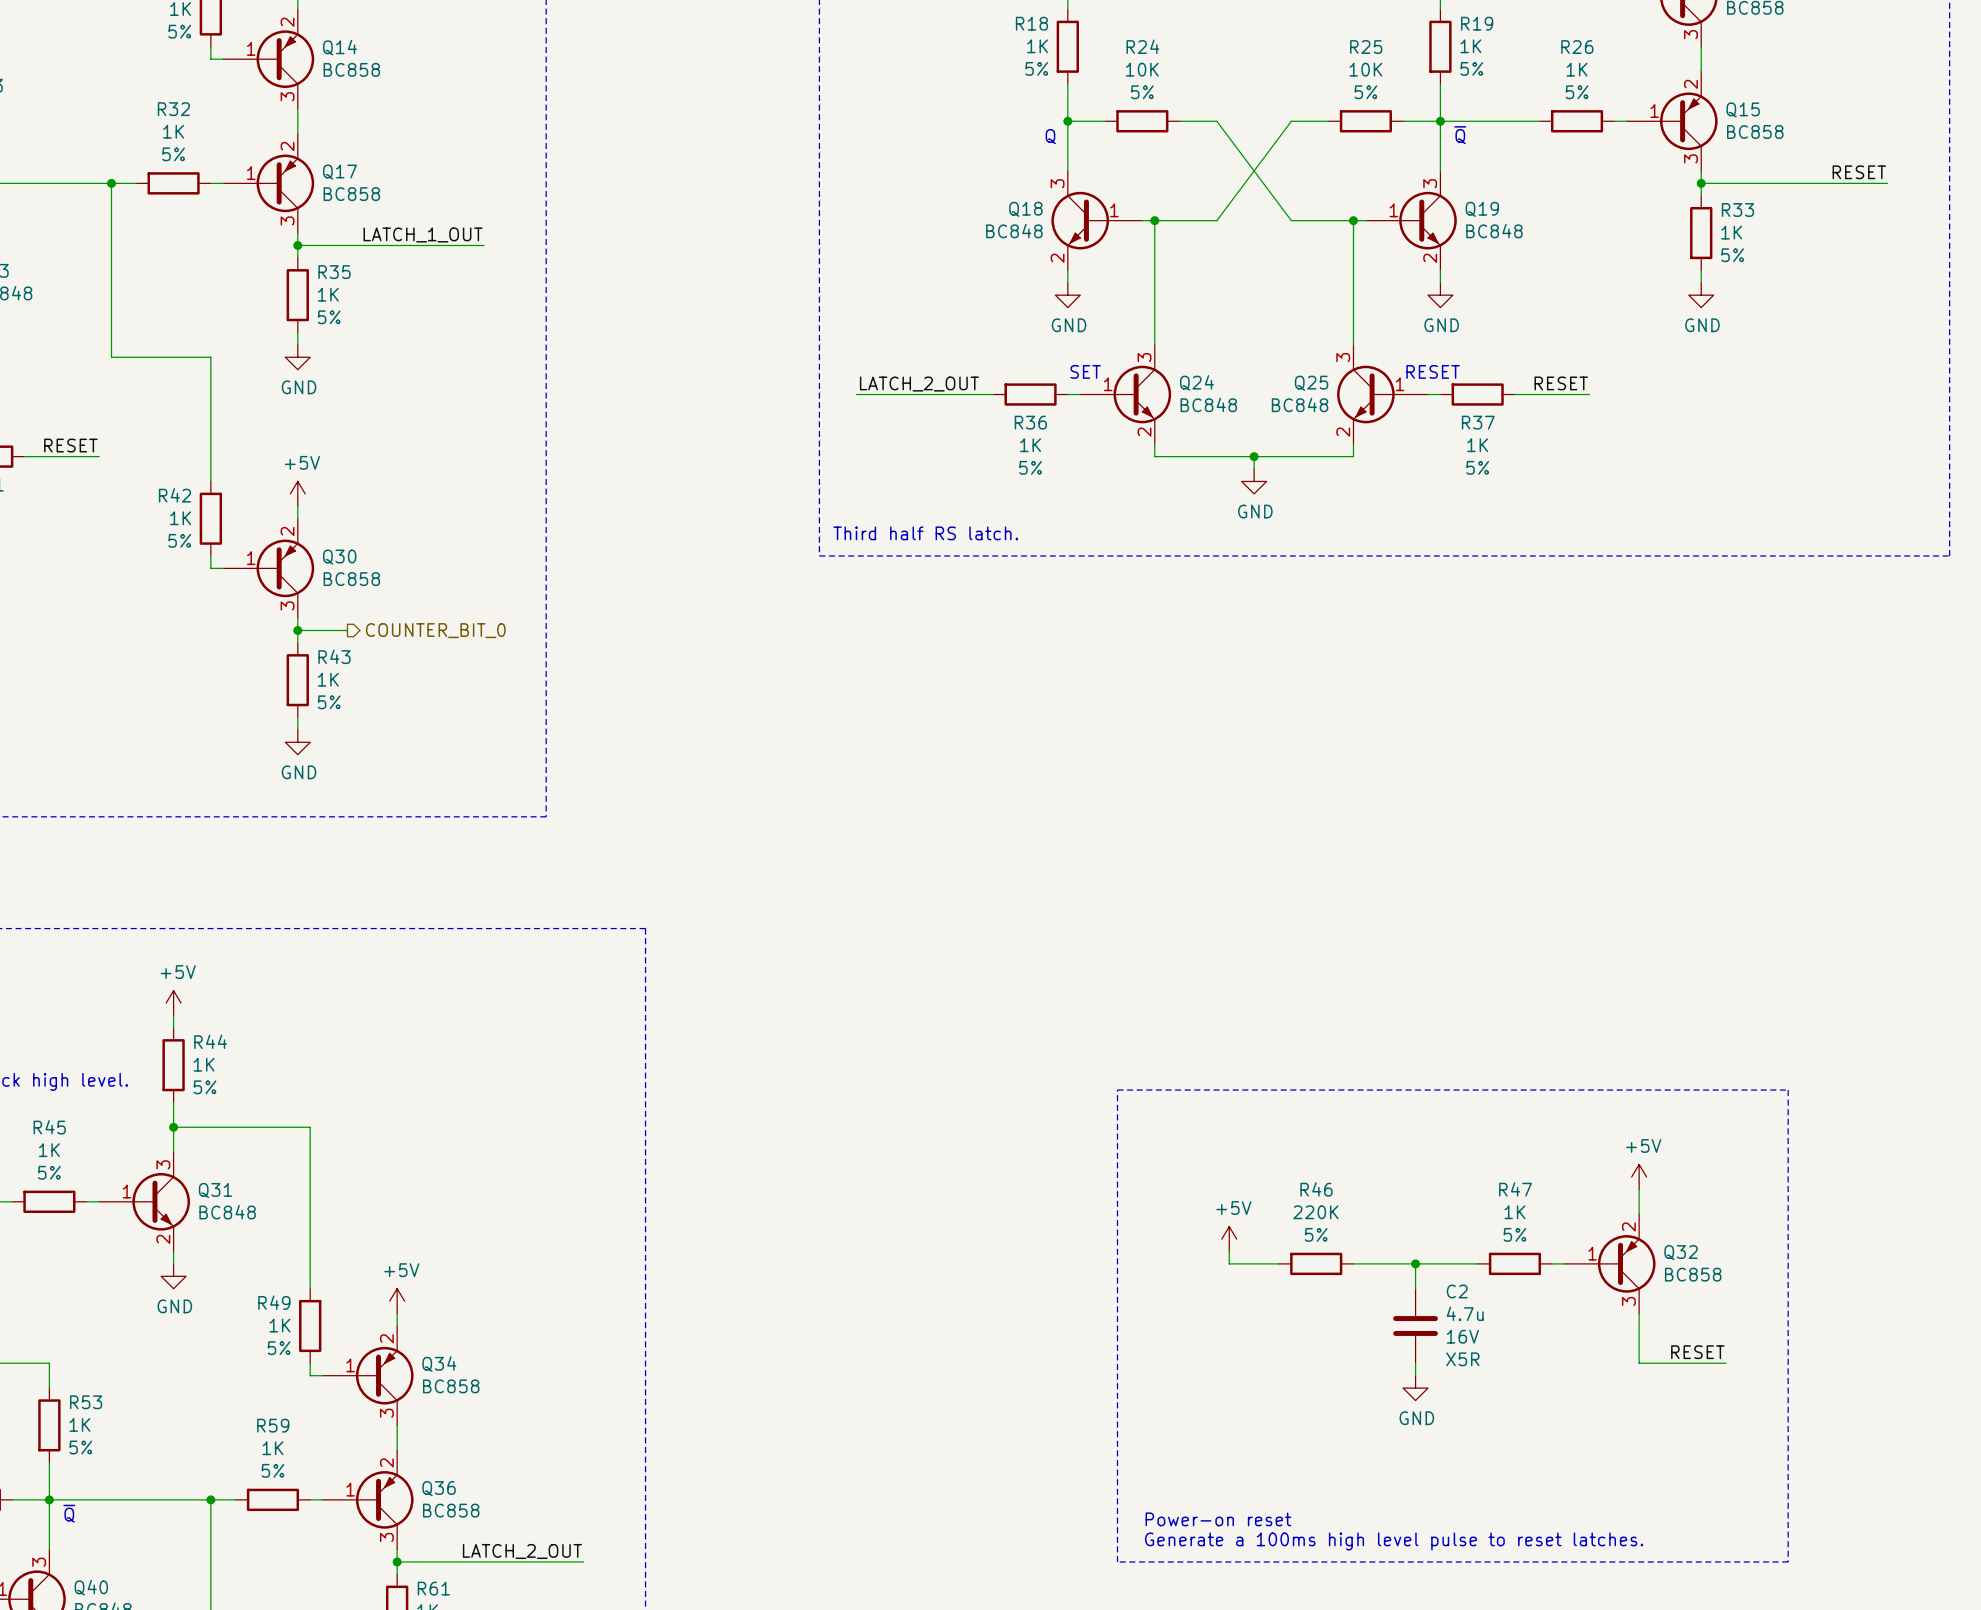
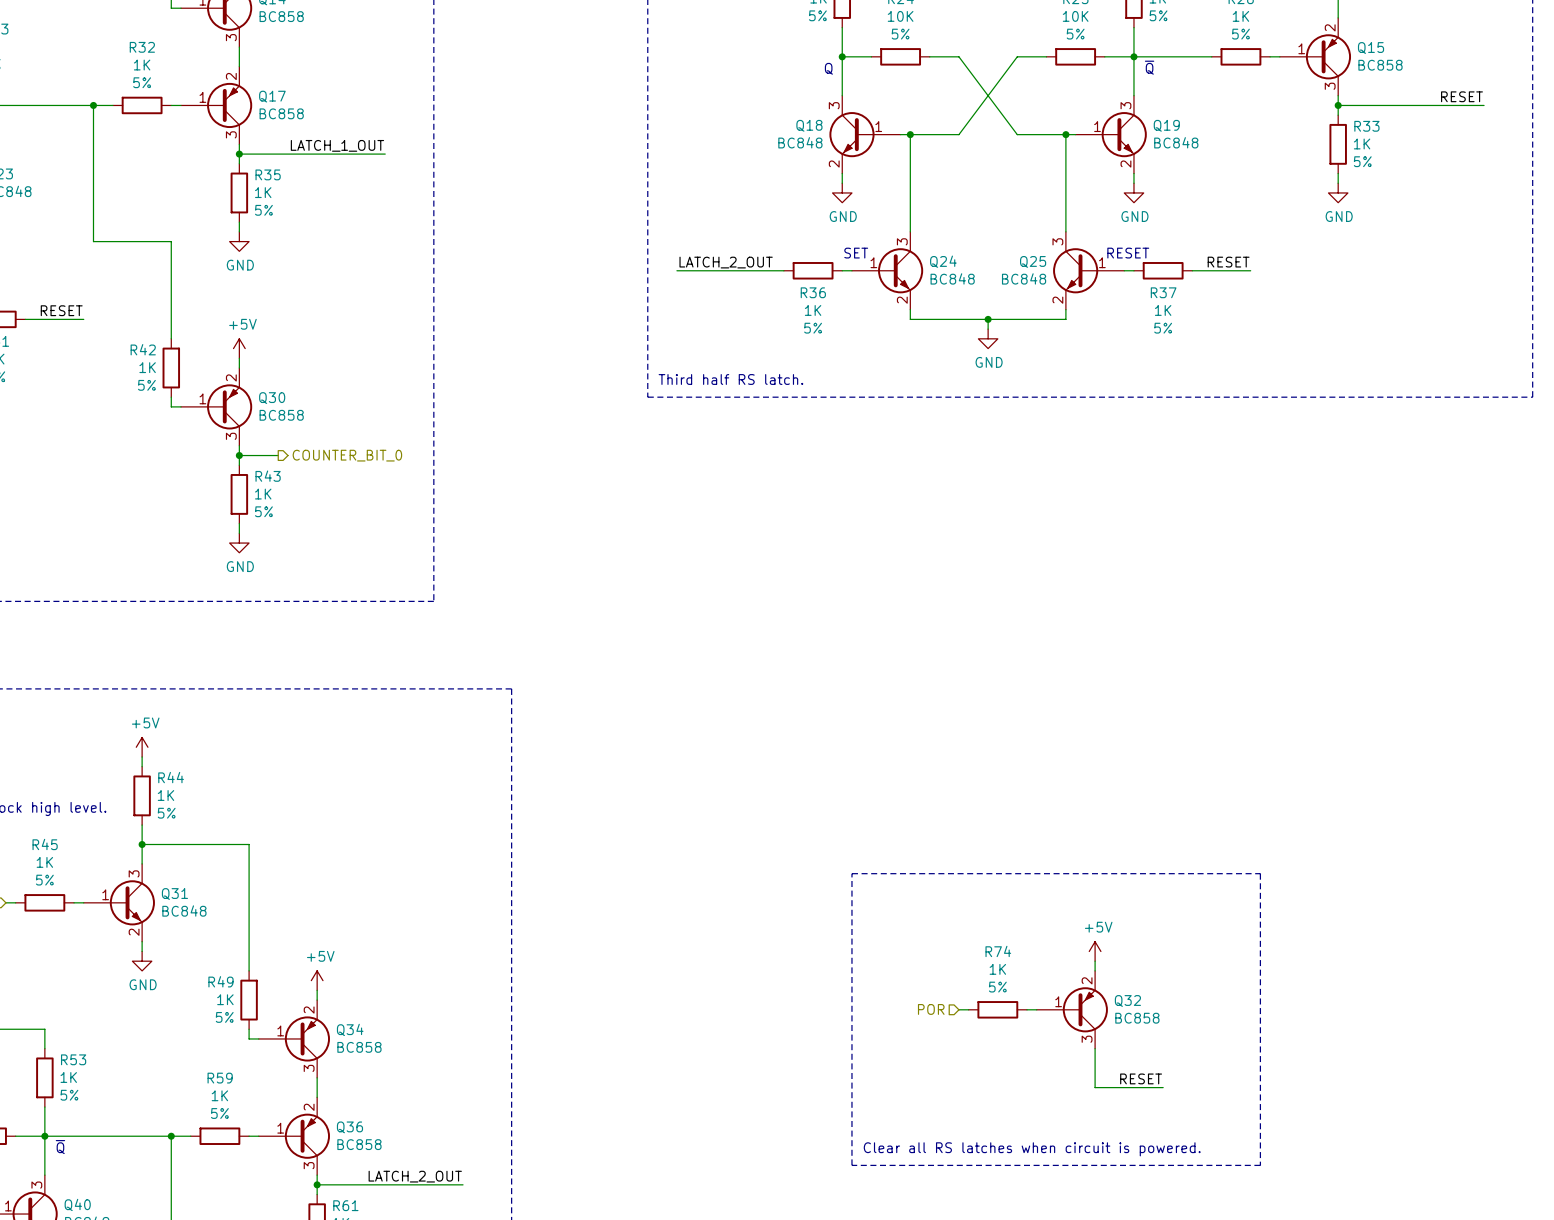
line: (1117, 1090) (1788, 1090) (1788, 1561) (1117, 1561) (1117, 1090) -> (851, 873) (851, 1165) (1260, 1165) (1260, 873) (851, 873)
power symbol: +5V (1639, 1176) -> none
wire: (1639, 1189) (1639, 1214) -> none
power symbol: +5V (1229, 1239) -> none
wire: (1229, 1251) (1229, 1263) (1278, 1263) -> none
R46: 220K (1316, 1263) -> none
wire: (1353, 1263) (1477, 1263) -> none
power symbol: none -> +5V (1095, 951)
wire: (1415, 1263) (1415, 1288) -> none
junction: (1415, 1263) -> none
R47: 1K (1514, 1263) -> none
wire: (1552, 1263) (1564, 1263) -> none
Q32 position: (1610, 1263) -> (1072, 1009)
wire: (1639, 1313) (1639, 1363) (1726, 1363) -> none
C2: 4.7u (1415, 1326) -> none
hierarchical label: none -> POR (931, 1009)
wire: none -> (958, 1009) (968, 1009)
R74: none -> 1K (997, 1009)
wire: none -> (1027, 1009) (1036, 1009)
label: RESET (1697, 1352) -> none
wire: (1415, 1363) (1415, 1375) -> (1095, 961) (1095, 970)
wire: none -> (1095, 1048) (1095, 1087) (1163, 1087)
power symbol: GND (1415, 1388) -> none
label: none -> RESET (1141, 1078)
text: none -> Clear all RS latches when circuit is powered. (1032, 1149)
text: Power-on reset (1218, 1519) -> none
text: Generate a 100ms high level pulse to reset latches. (1394, 1541) -> none

